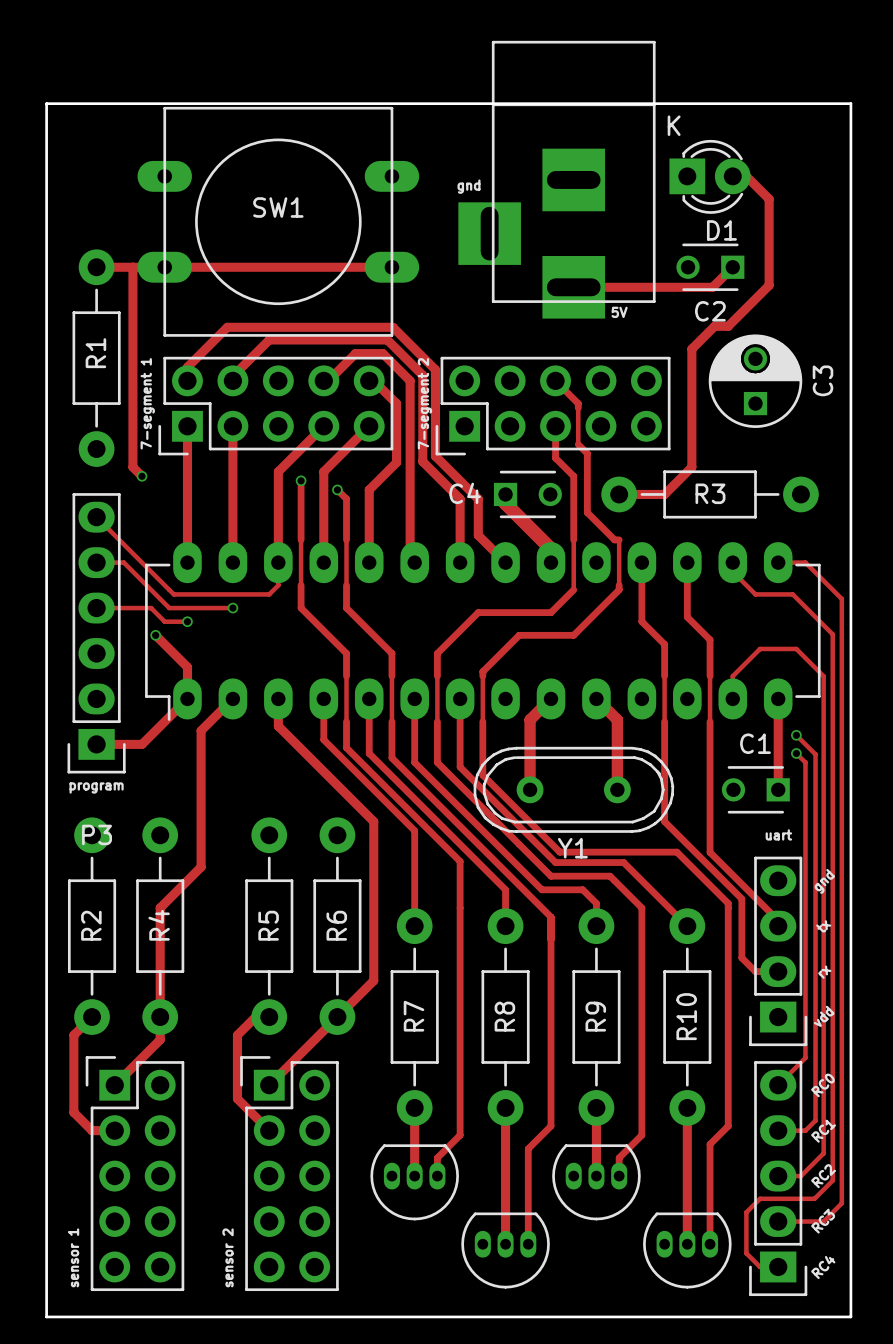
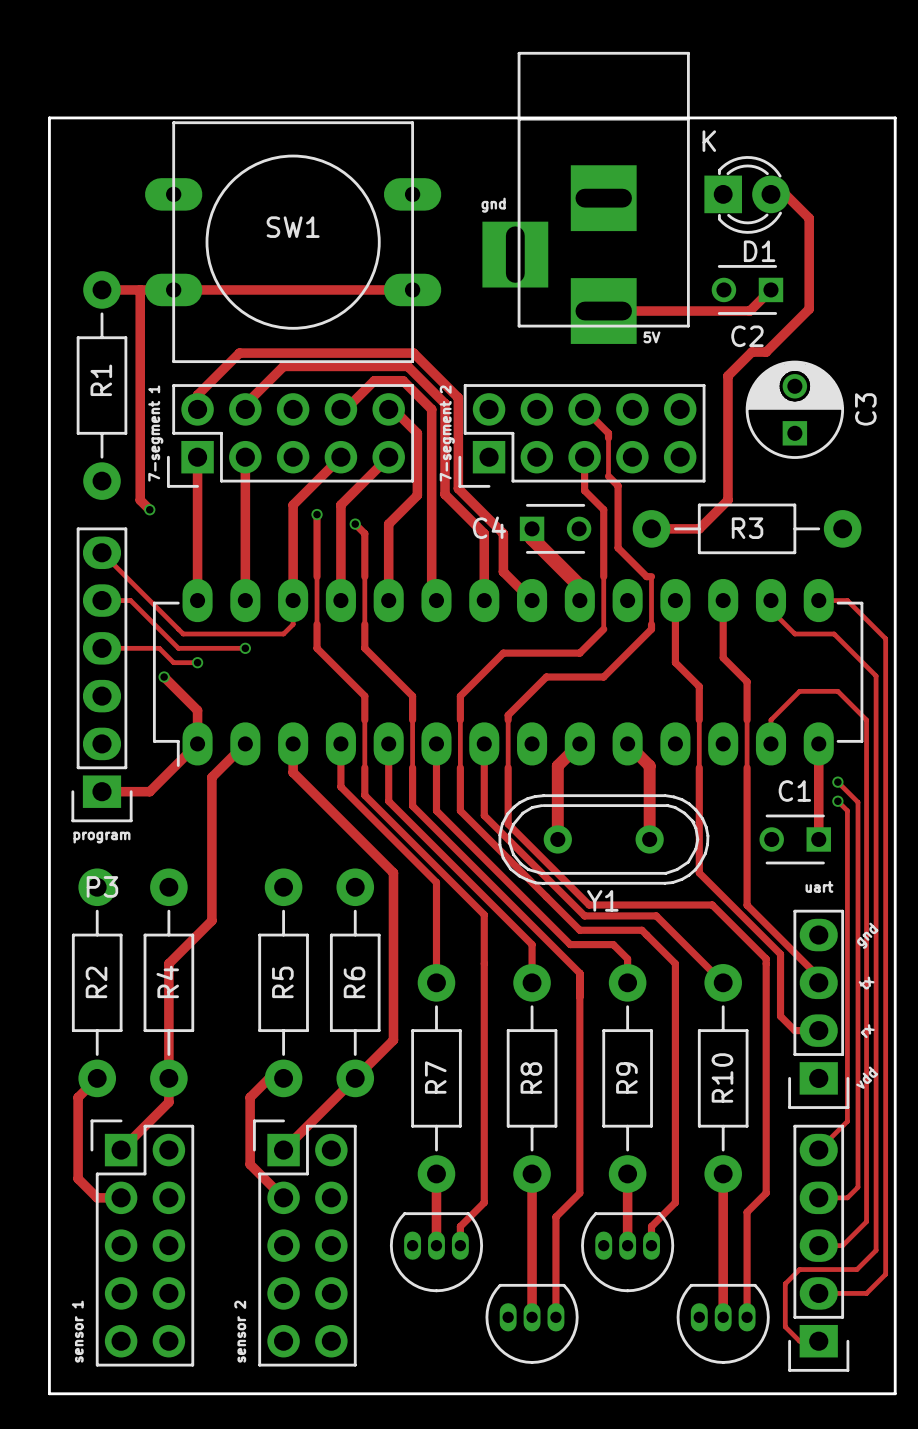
text: RC0 (822, 1085) -> none
text: RC1 (823, 1131) -> none
text: RC2 (823, 1176) -> none
text: RC3 (823, 1221) -> none
text: RC4 (823, 1267) -> none

